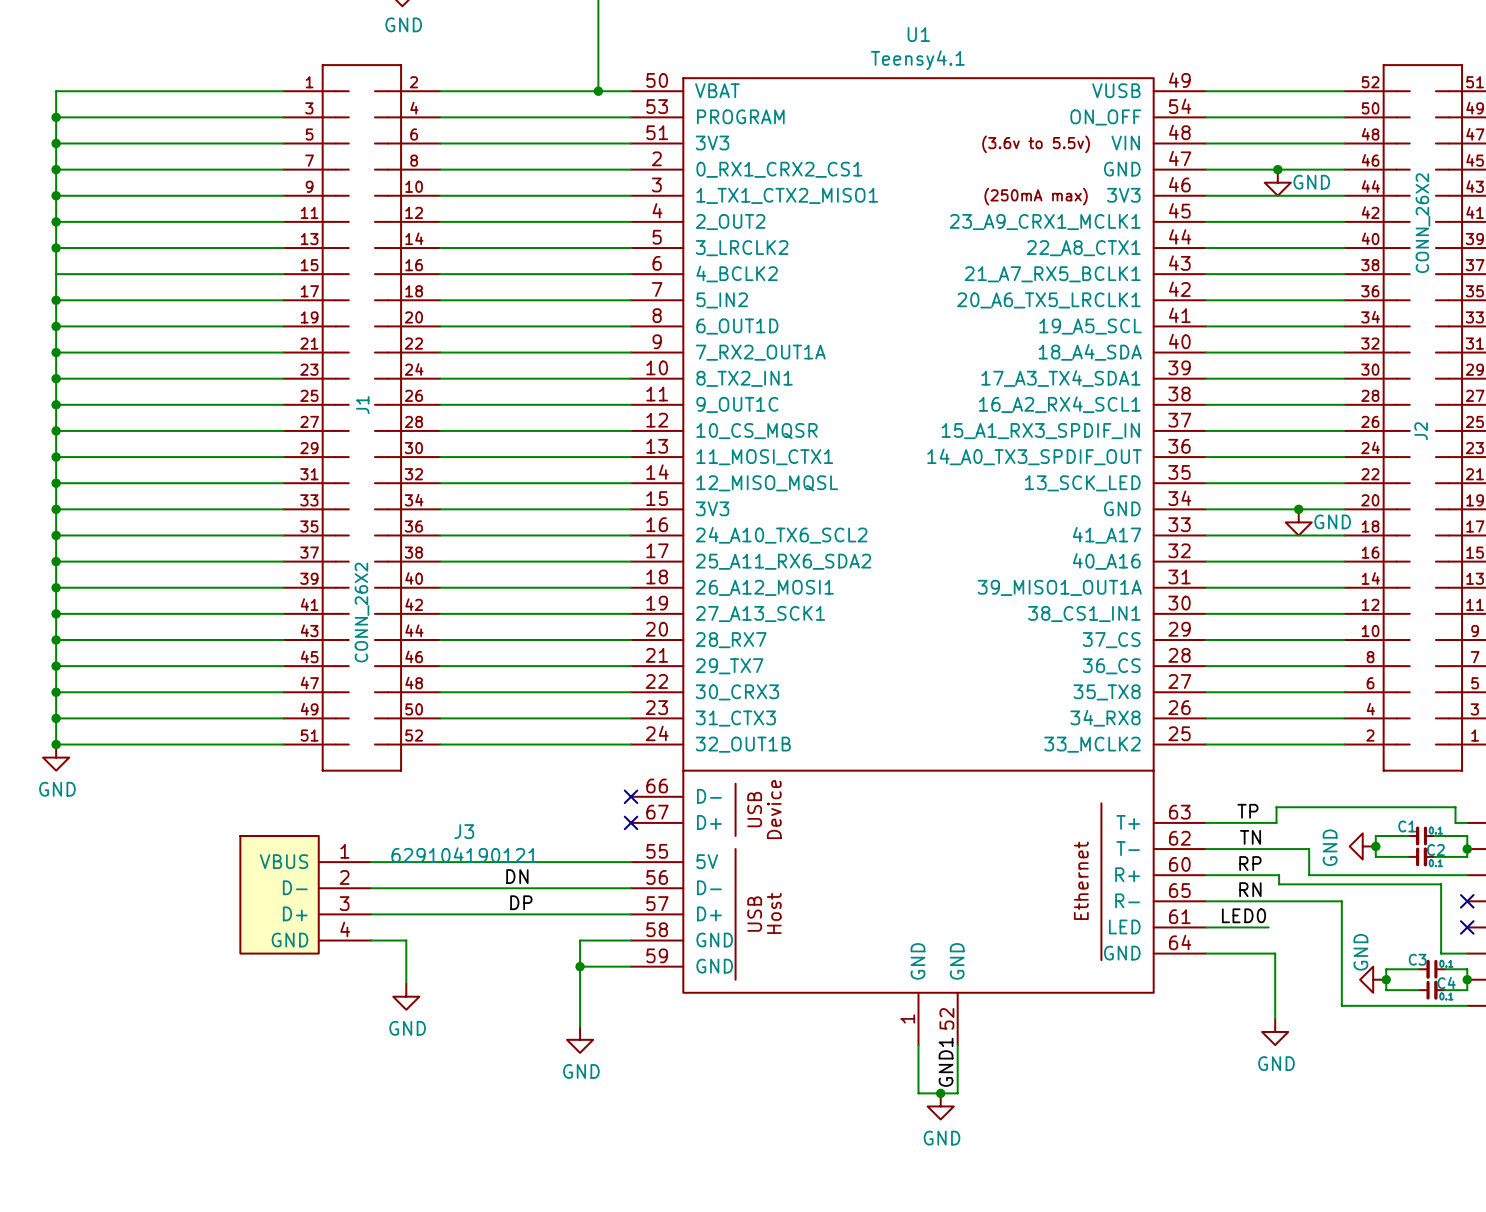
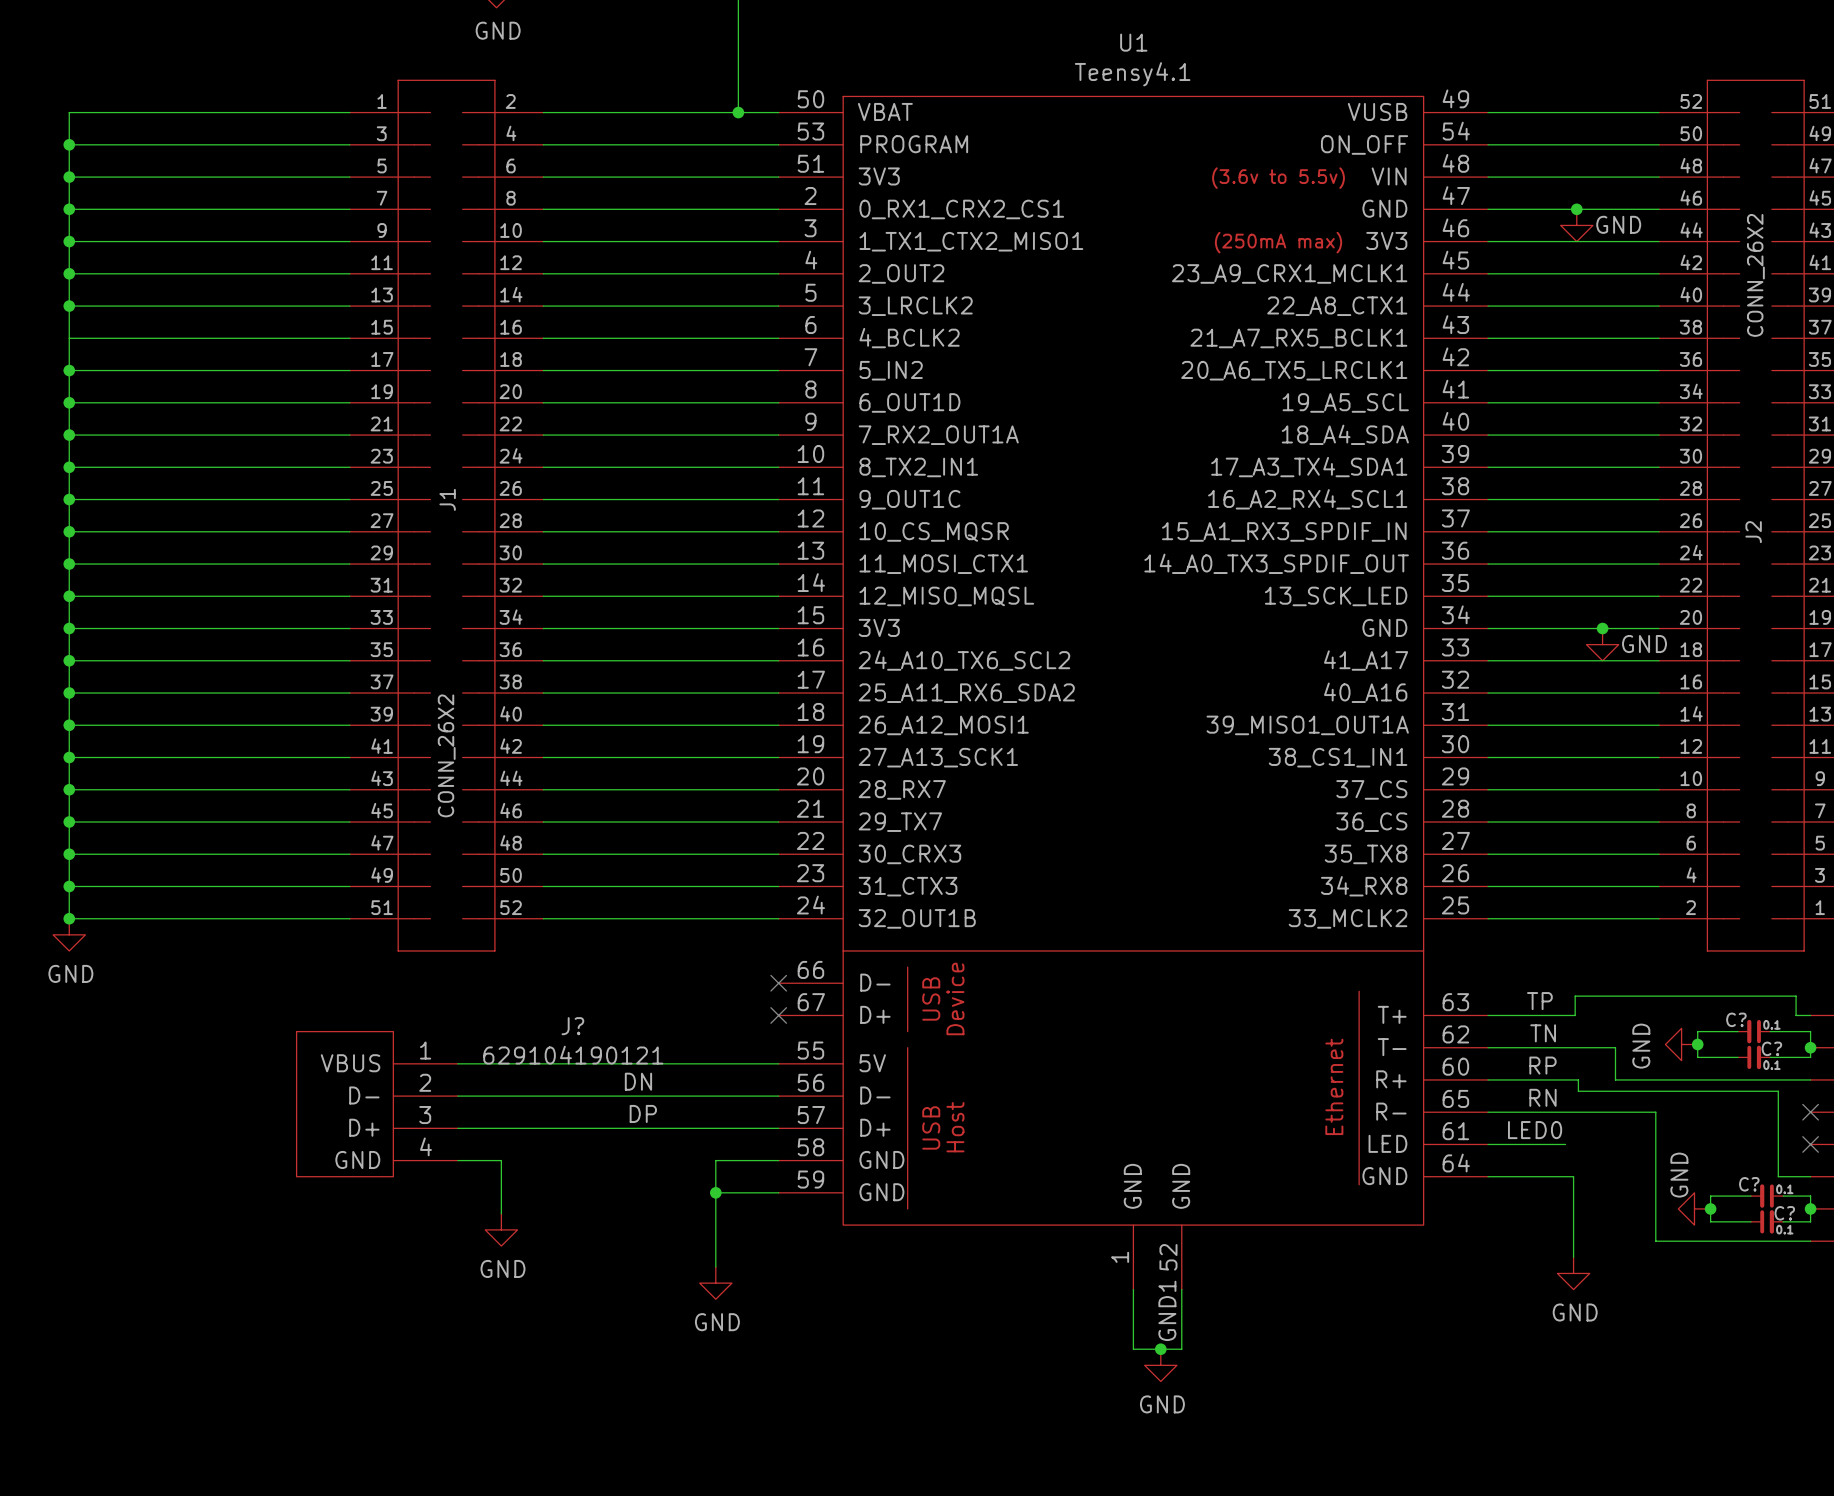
C1 name: C1 (1407, 826) -> C? (1736, 1019)
J3 name: J3 (464, 831) -> J? (572, 1026)
C2 name: C2 (1435, 849) -> C? (1771, 1048)
C3 name: C3 (1417, 959) -> C? (1749, 1184)
C4 name: C4 (1446, 983) -> C? (1784, 1213)

